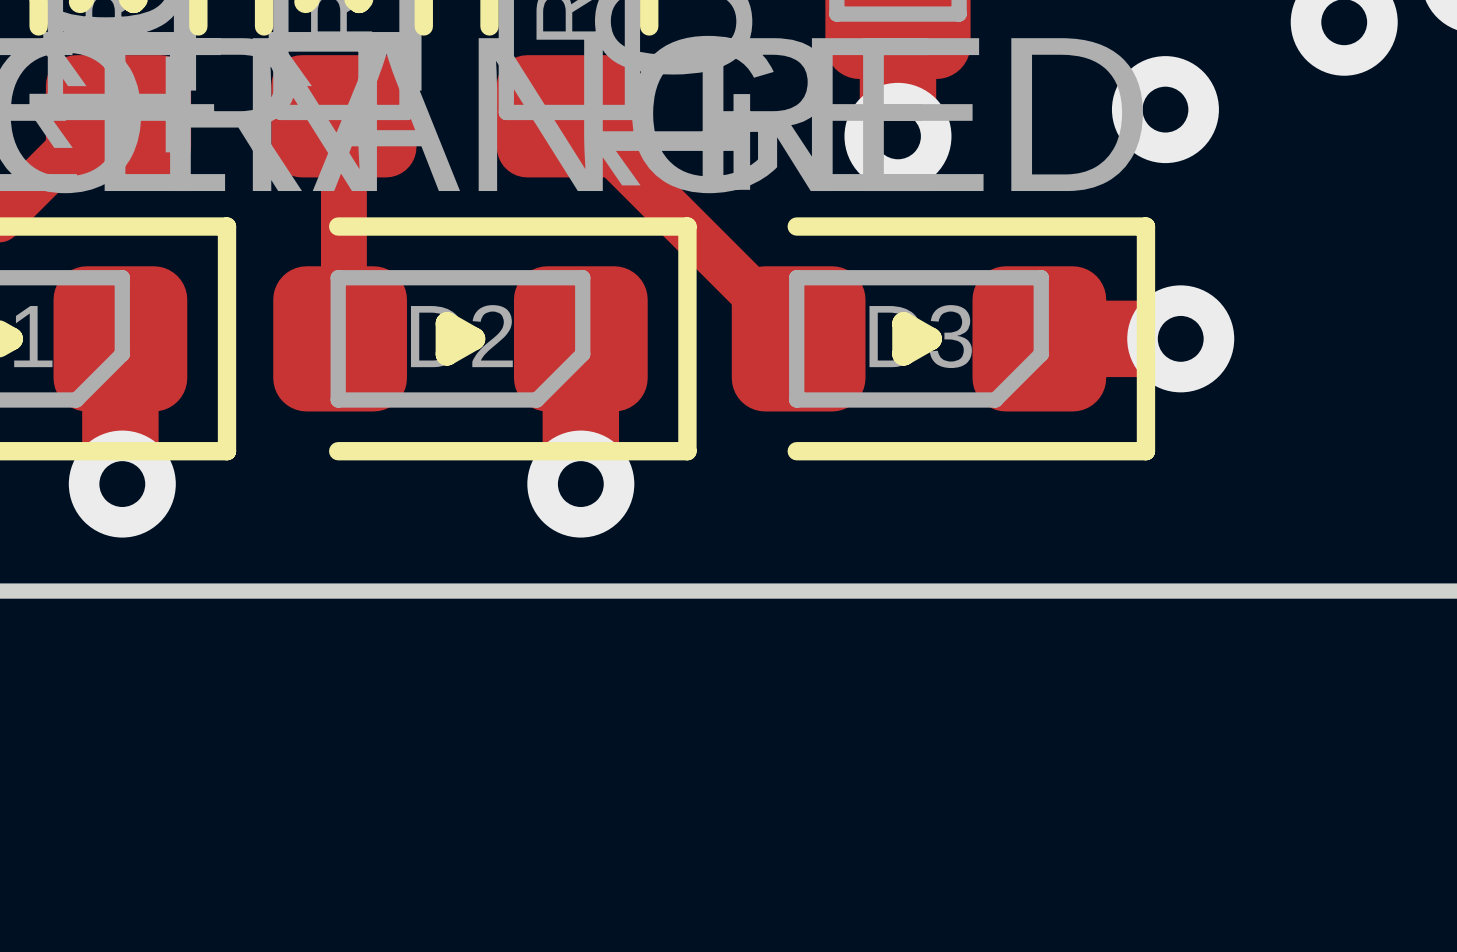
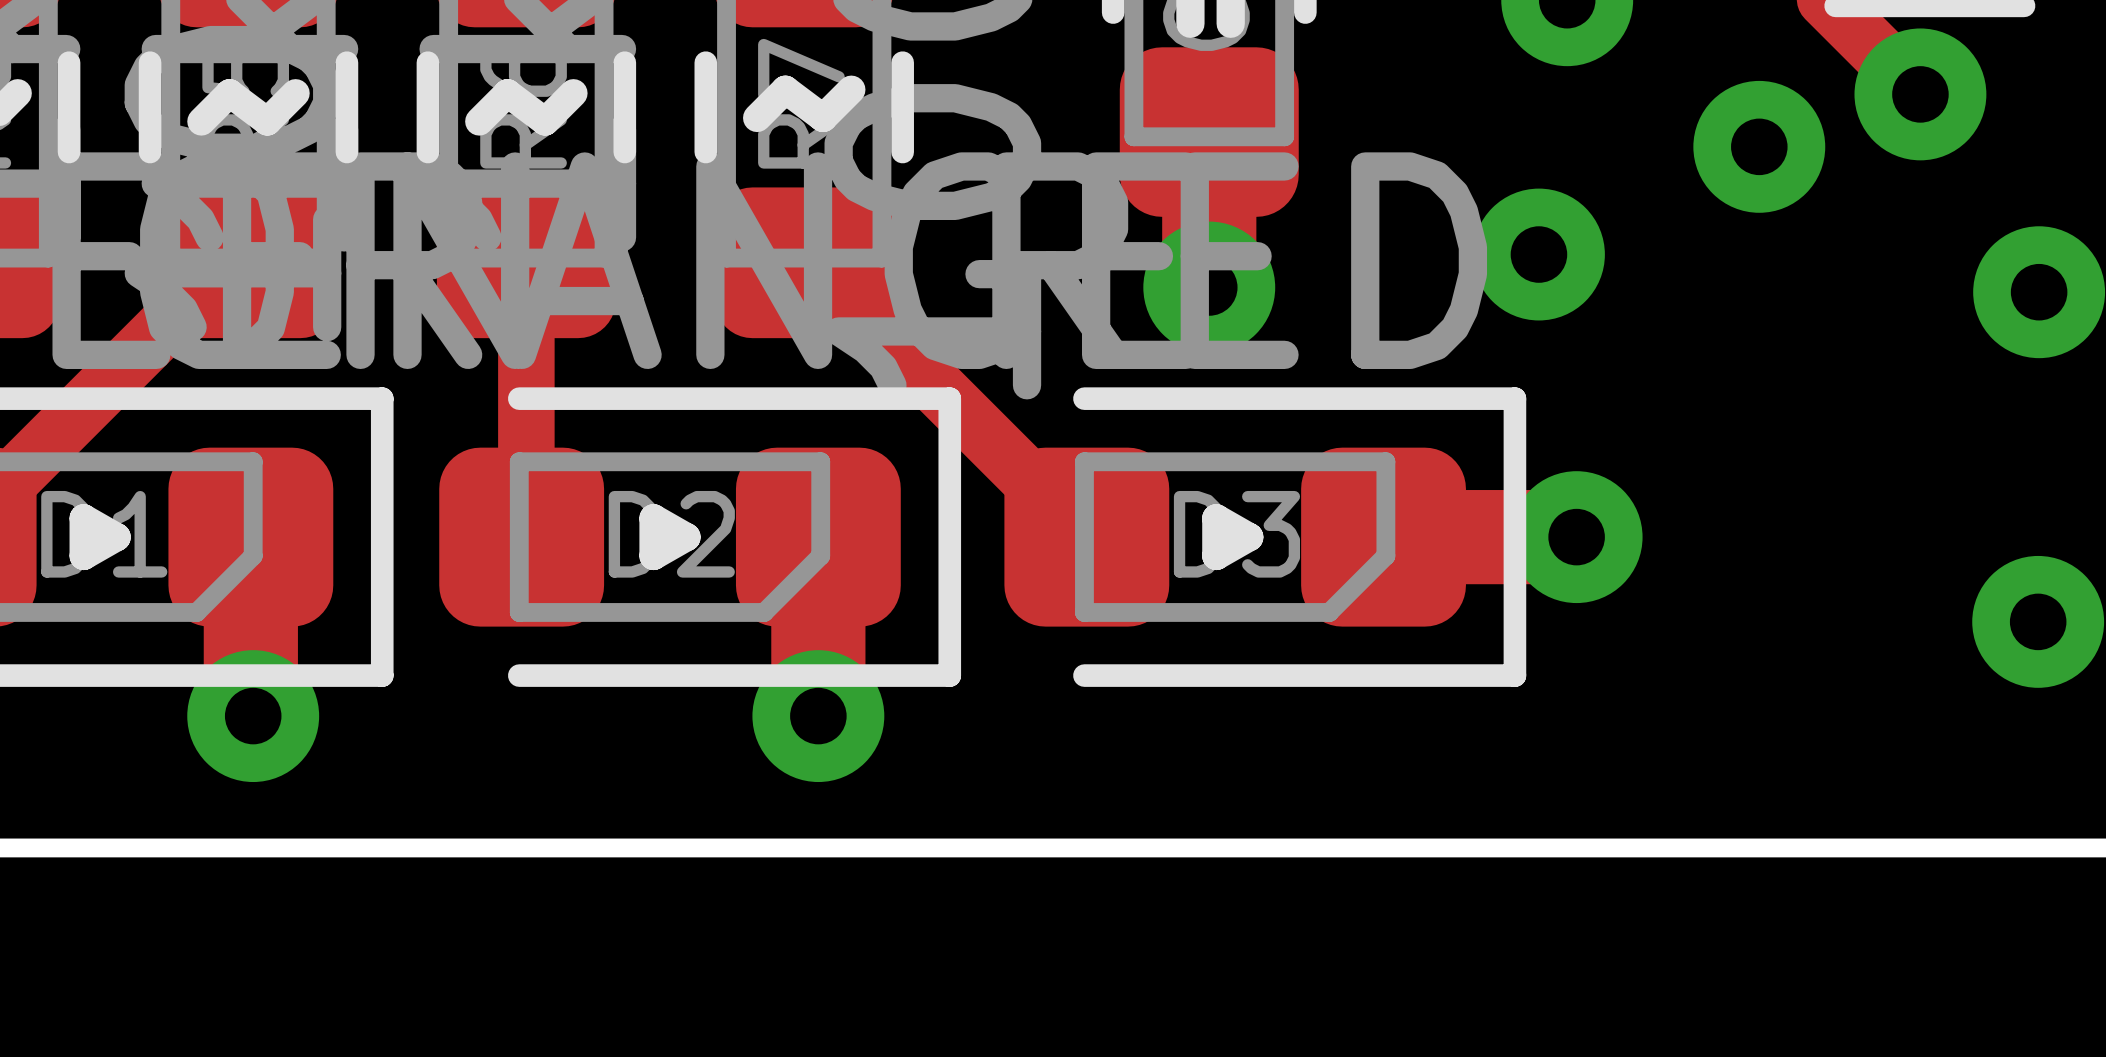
via position: (1180, 338) -> (1576, 537)

